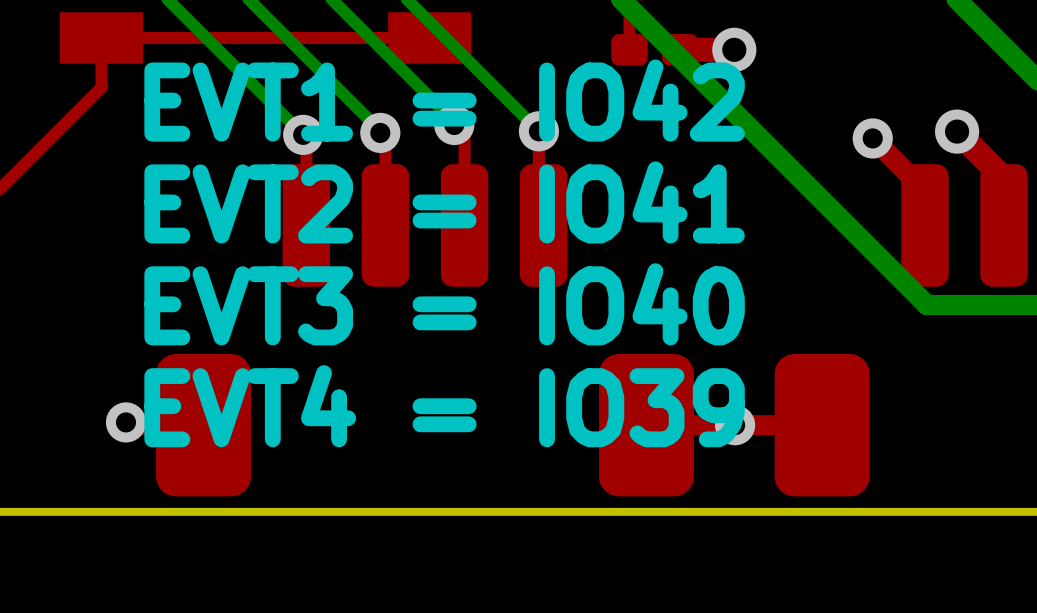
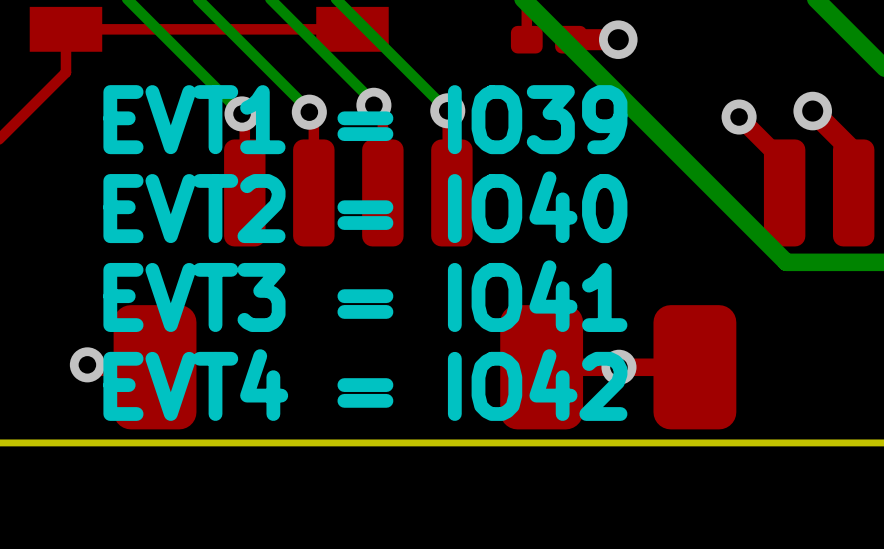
text: EVT1 = IO42 (444, 100) -> none
text: none -> EVT1 = IO39 (365, 119)
text: EVT2 = IO41 (444, 202) -> none
text: none -> EVT2 = IO40 (365, 207)
text: EVT3 = IO40 (444, 304) -> none
text: none -> EVT3 = IO41 (365, 296)
text: EVT4 = IO39 (444, 406) -> none
text: none -> EVT4 = IO42 (365, 385)

